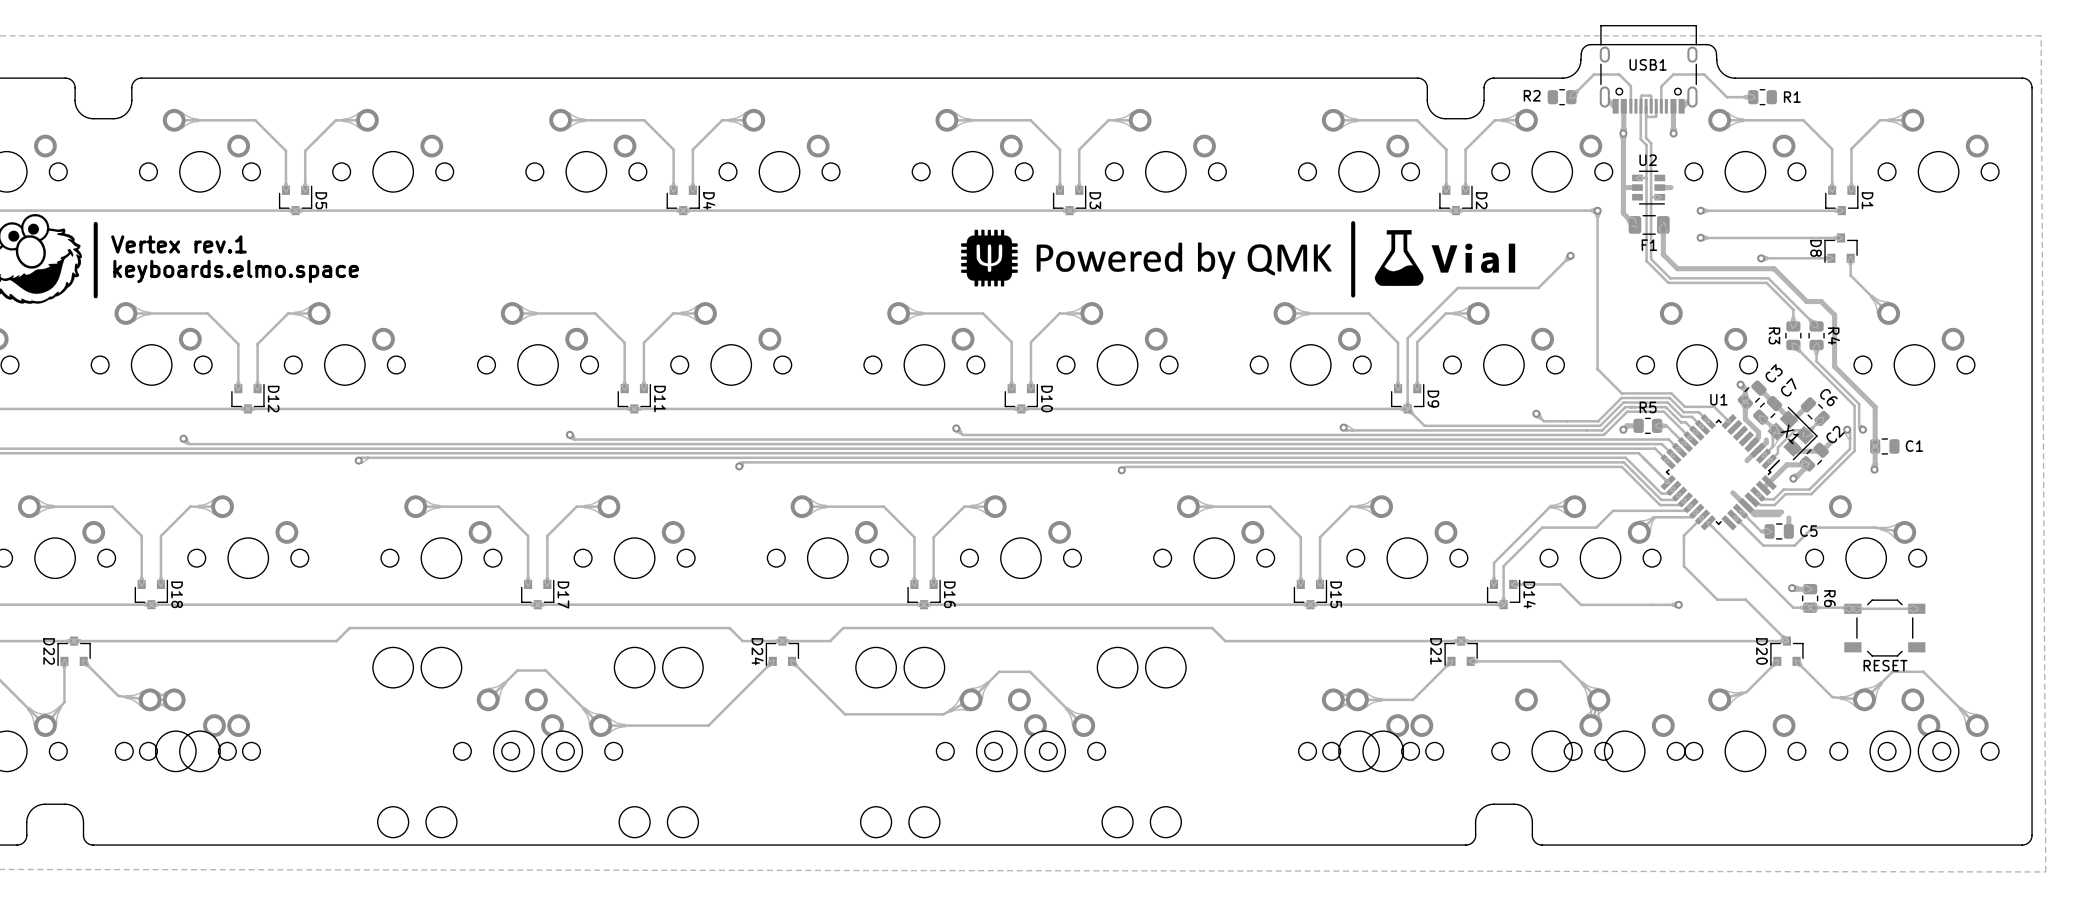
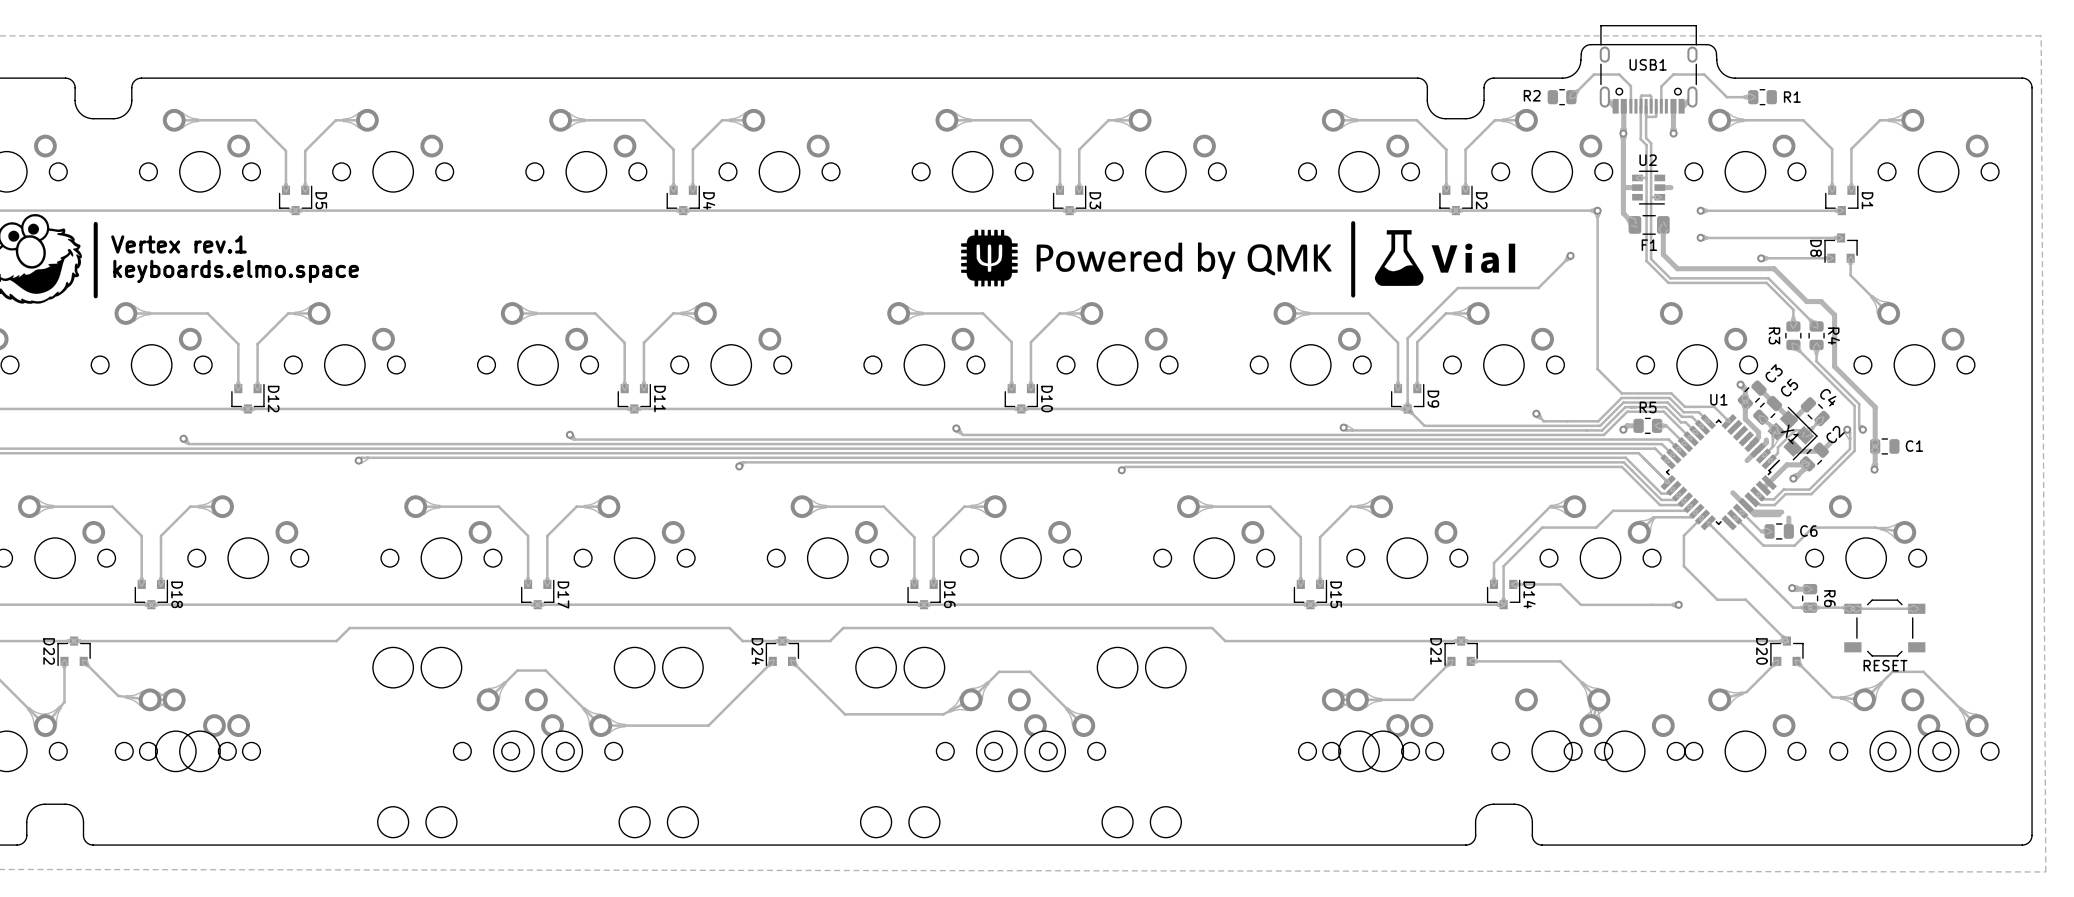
C7 name: C7 (1788, 387) -> C5 (1789, 387)
C6 name: C6 (1828, 397) -> C4 (1828, 397)
C5 name: C5 (1808, 531) -> C6 (1808, 531)

